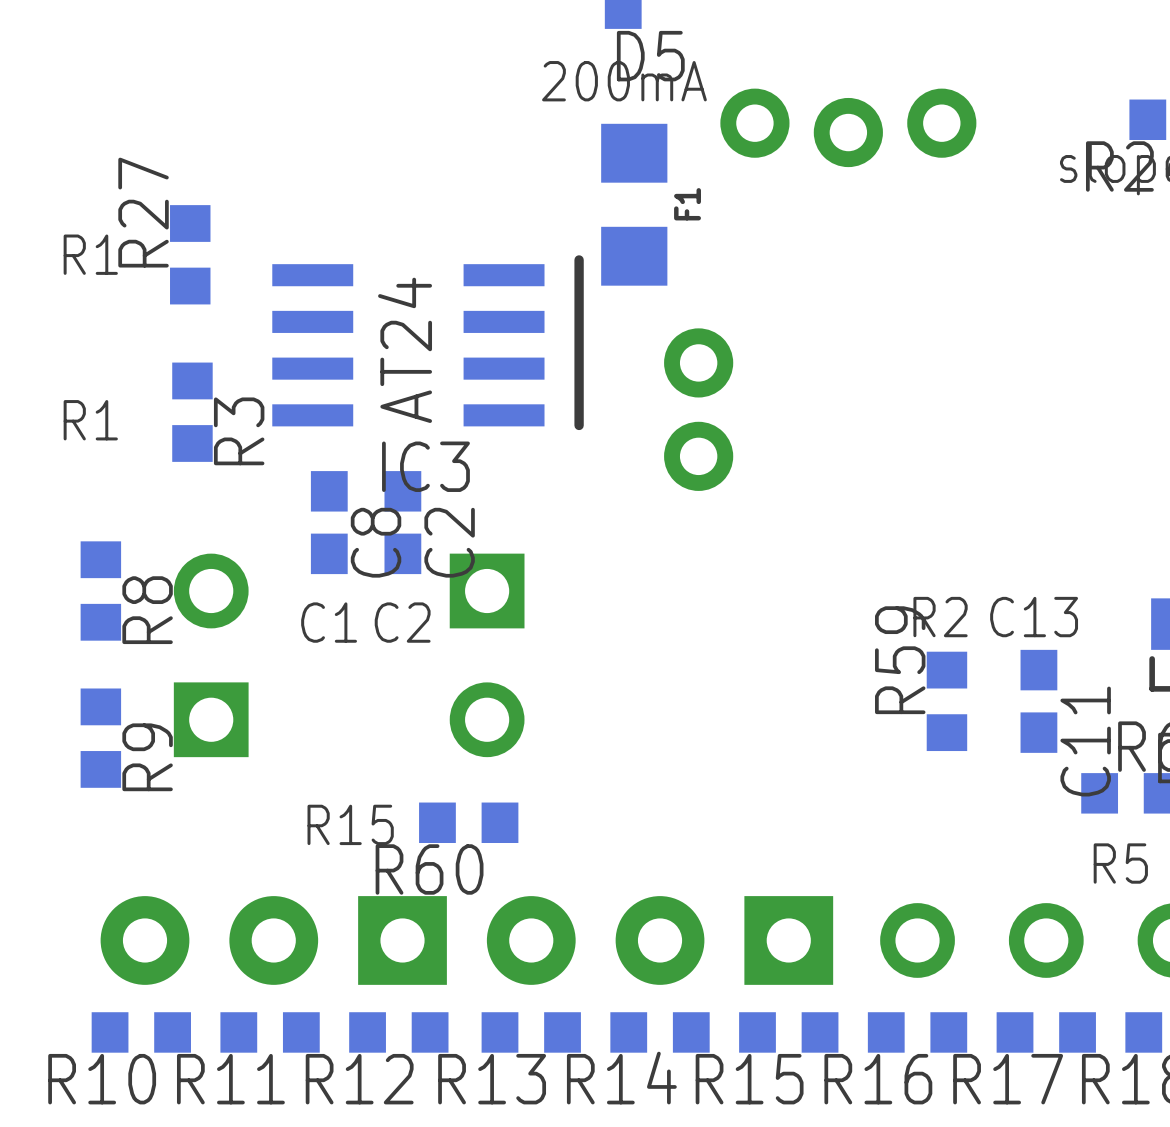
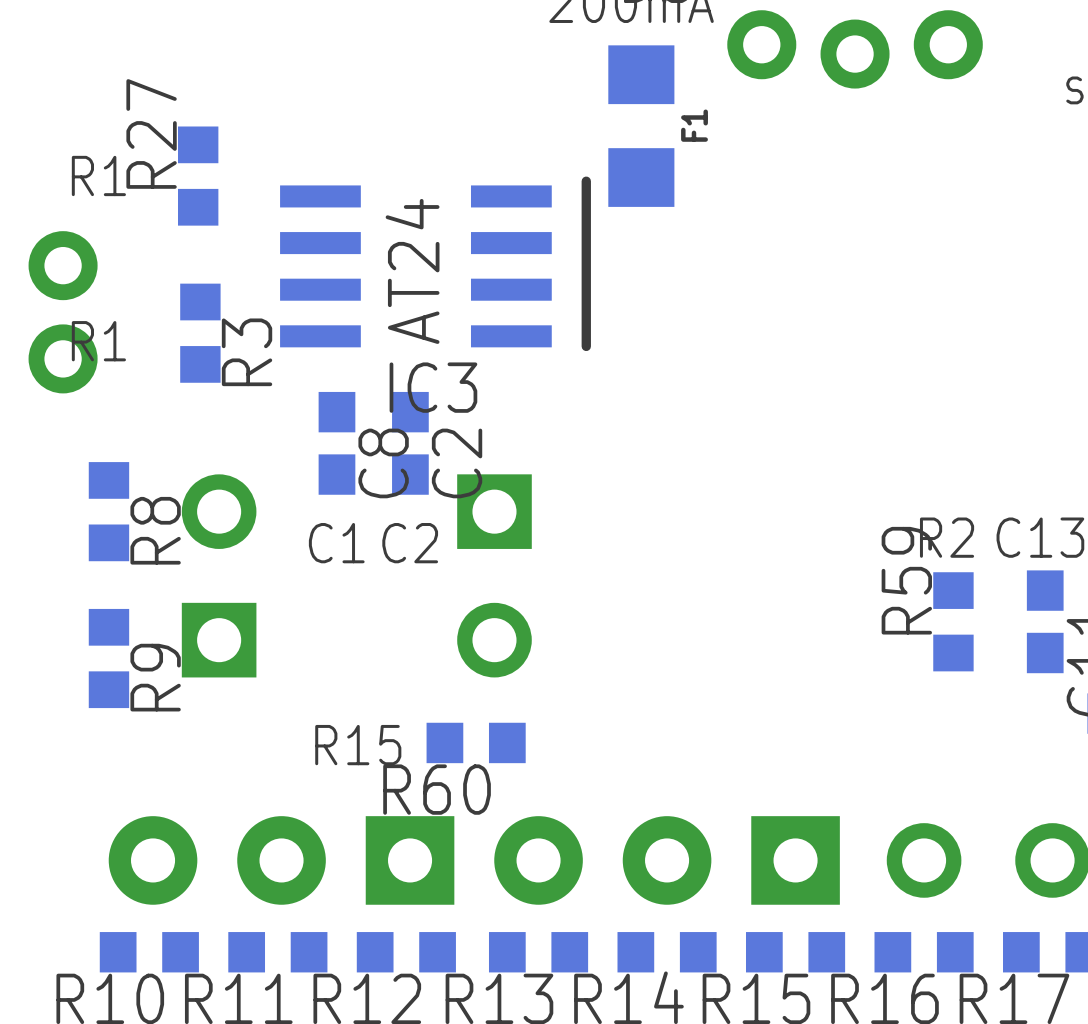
part position: (698, 409) -> (63, 312)

